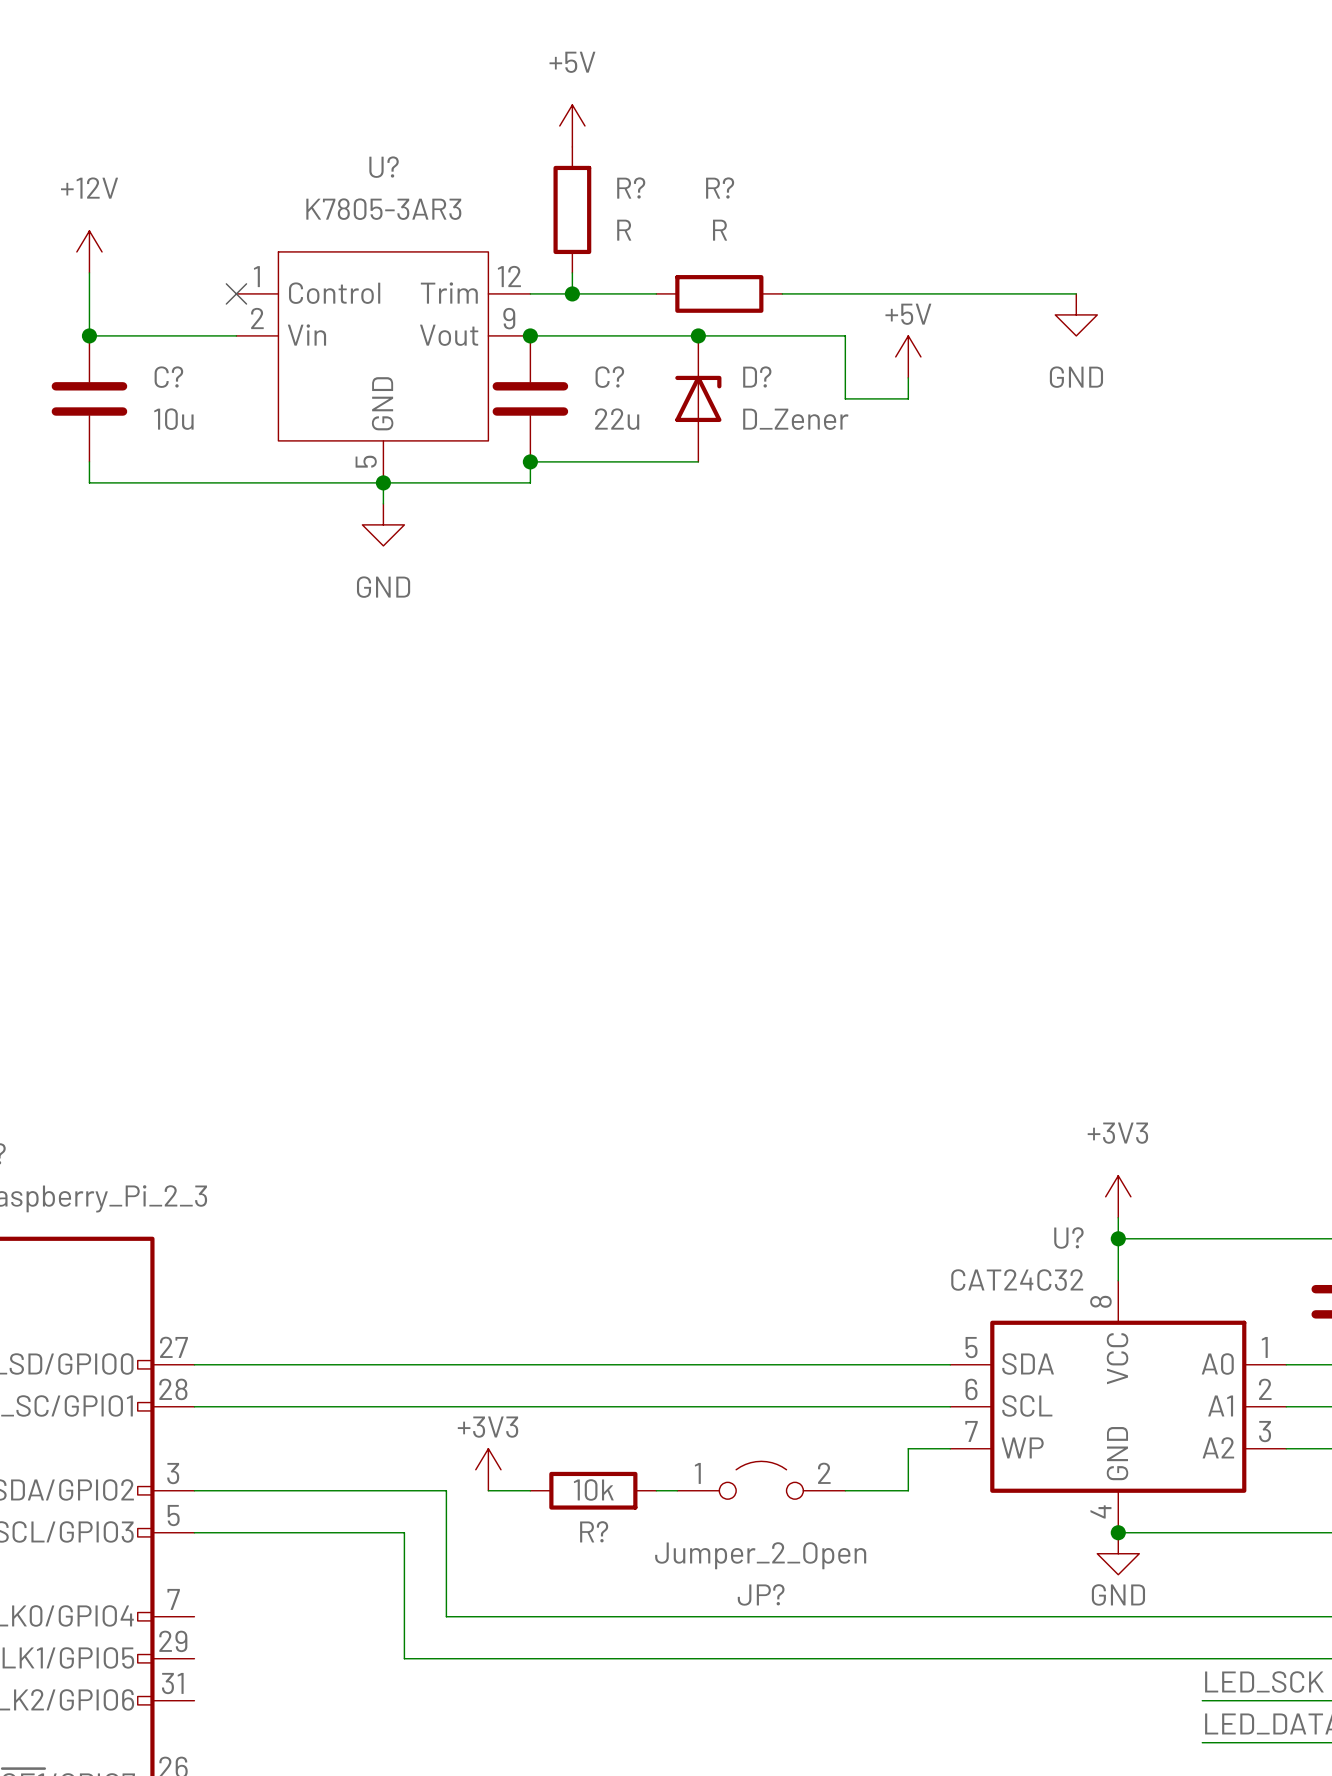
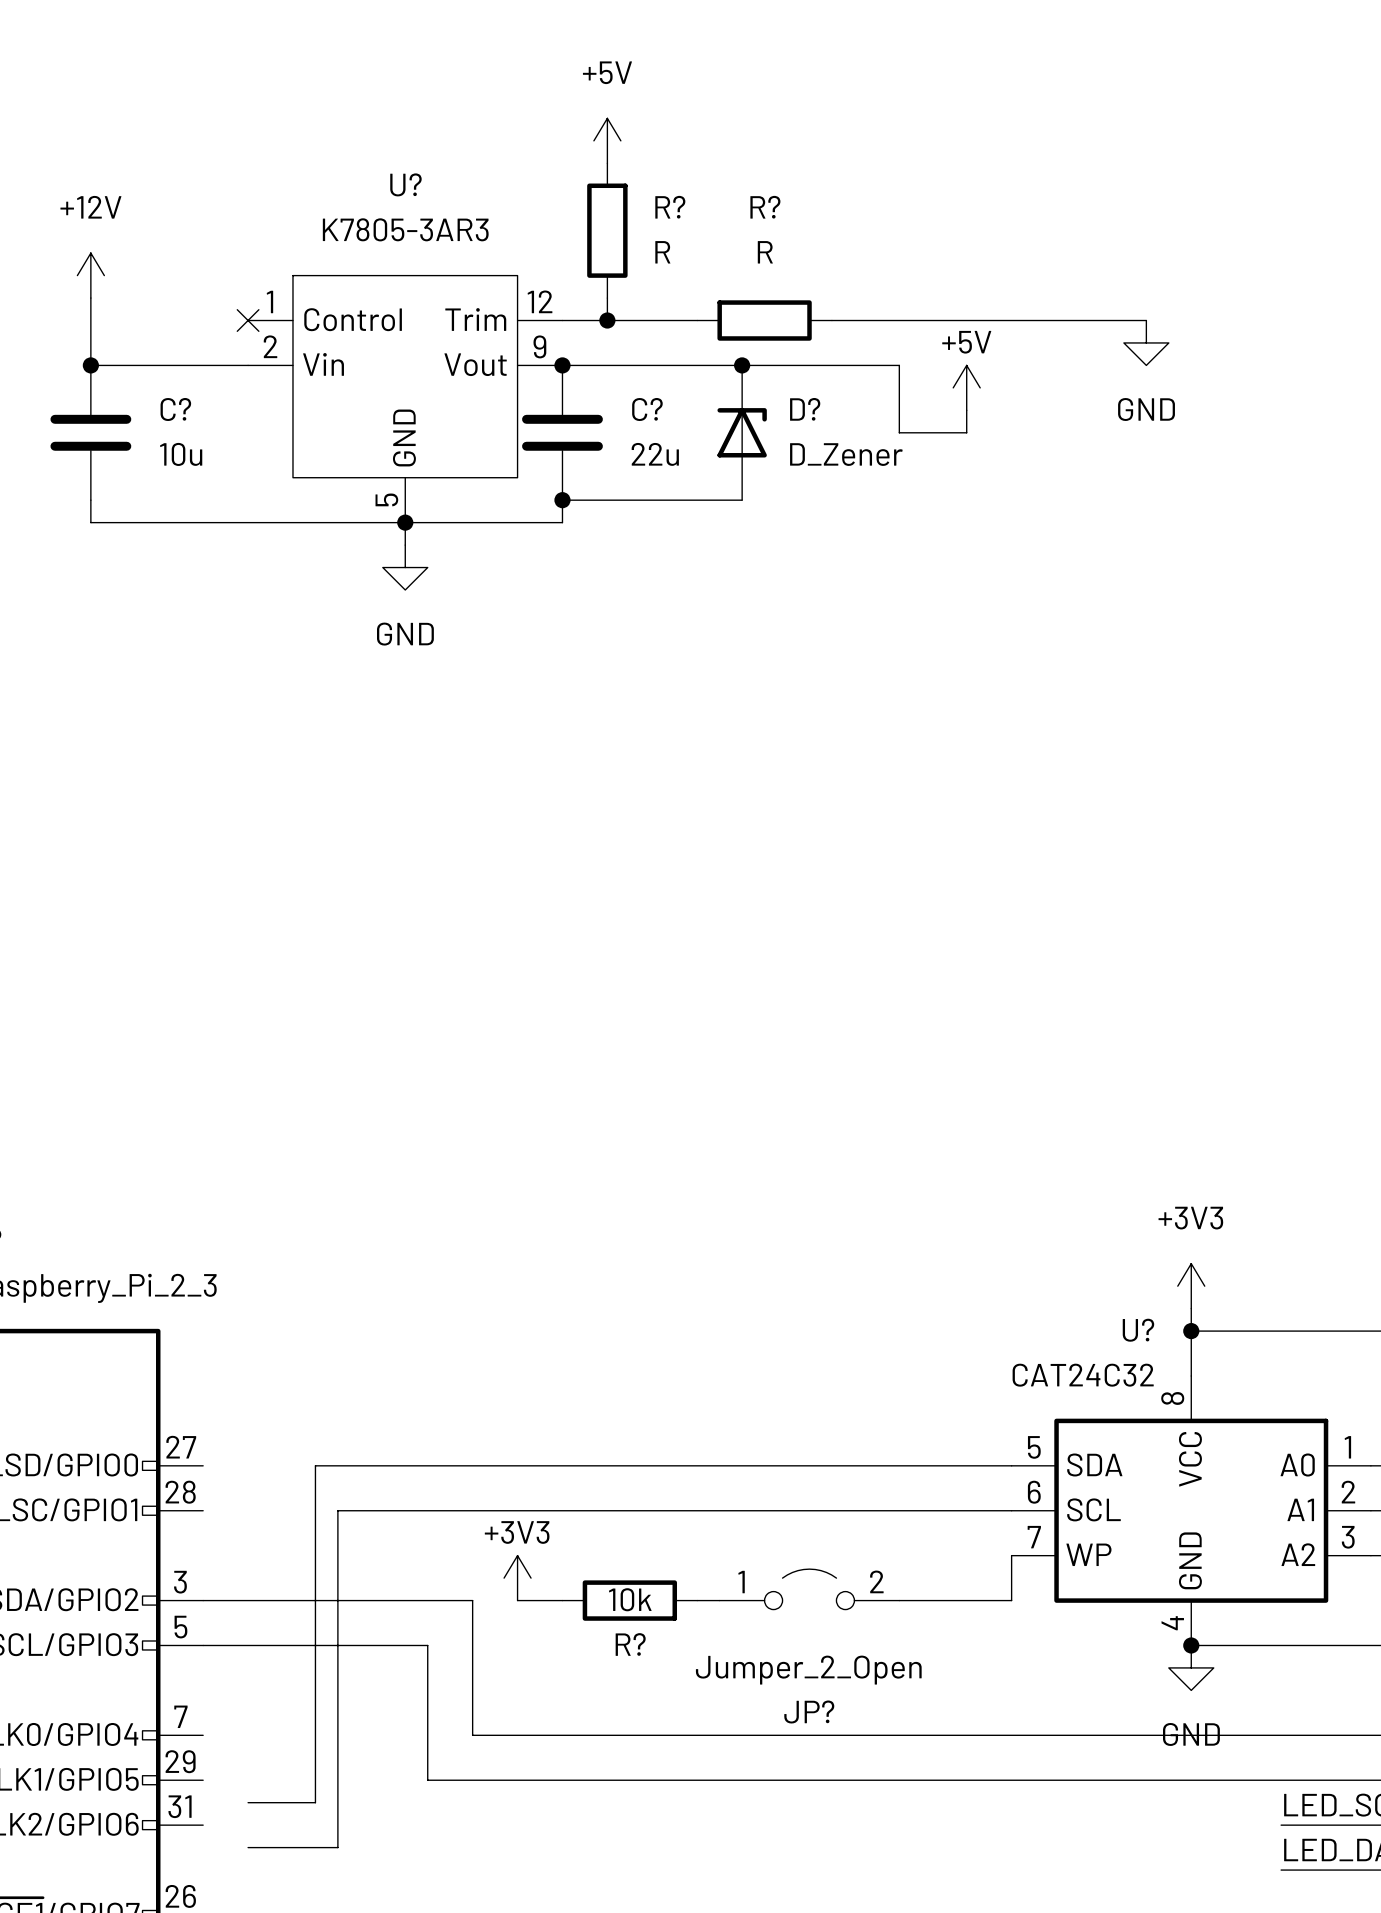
wire: (194, 1364) (299, 1364) -> (248, 1802) (315, 1802) (315, 1465)
wire: (194, 1406) (320, 1406) -> (248, 1847) (337, 1847) (337, 1510)
wire: (950, 1448) (908, 1448) (908, 1490) -> (1011, 1555) (1011, 1600) (966, 1600)
power symbol text position: GND (1118, 1594) -> GND (1191, 1734)

